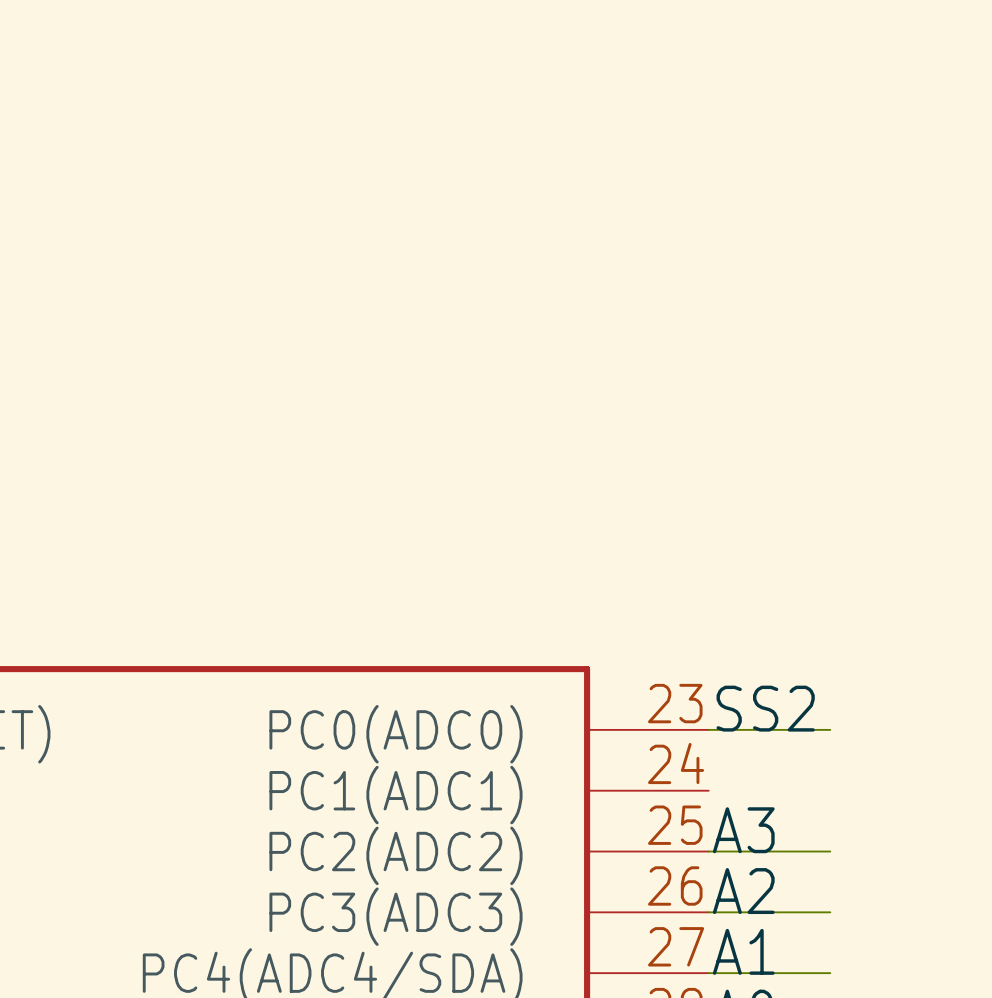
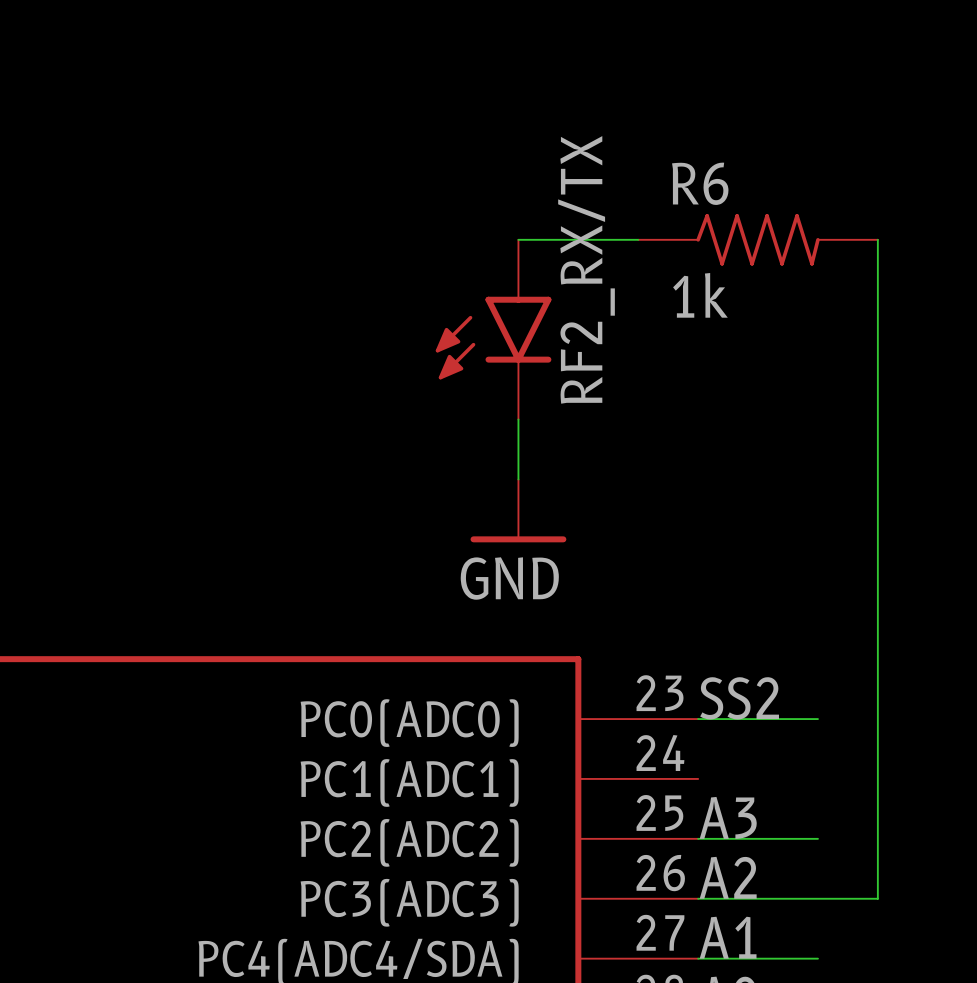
wire: none -> (518, 239) (638, 239)
R6: none -> 1k (758, 239)
wire: none -> (877, 239) (877, 898) (817, 898)
RF2_RX/TX: none -> (493, 329)
wire: none -> (518, 419) (518, 479)
power symbol: none -> GND (518, 510)

